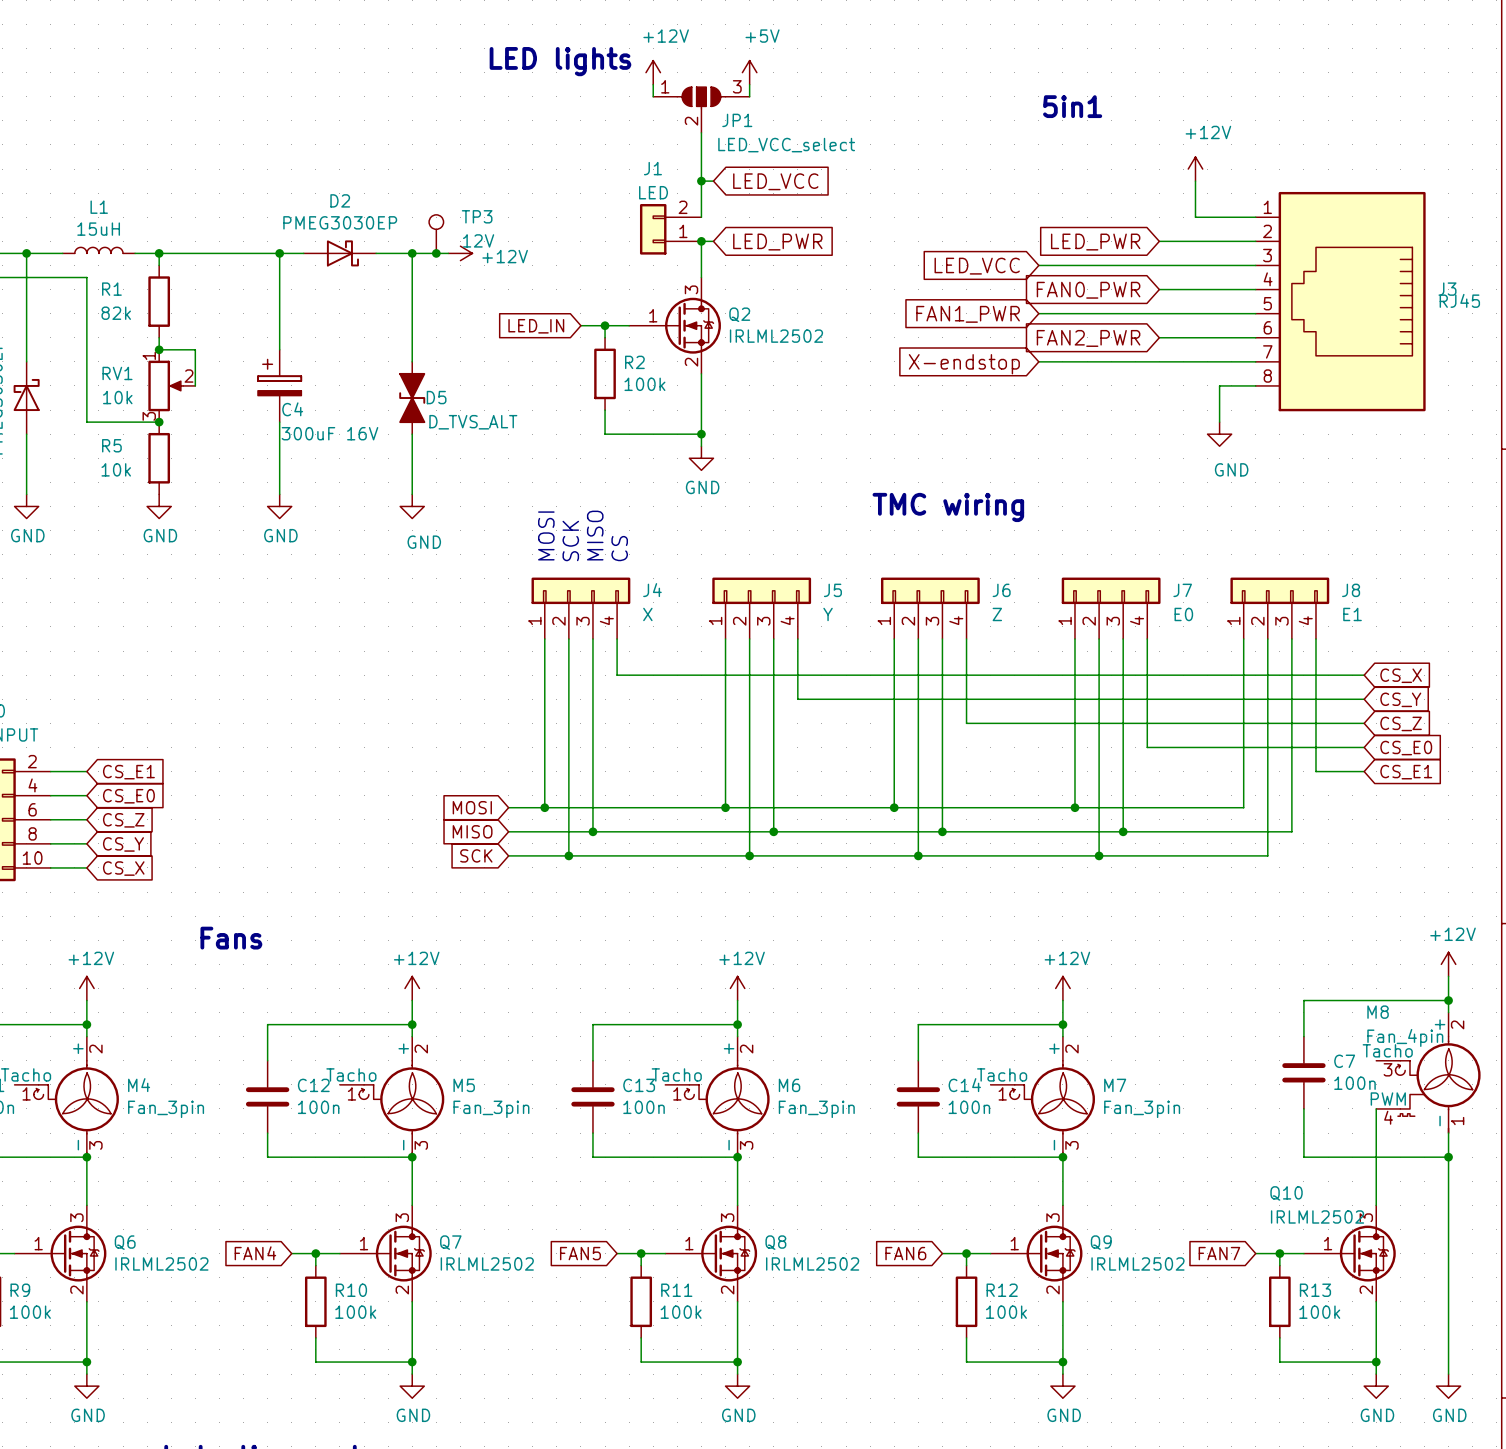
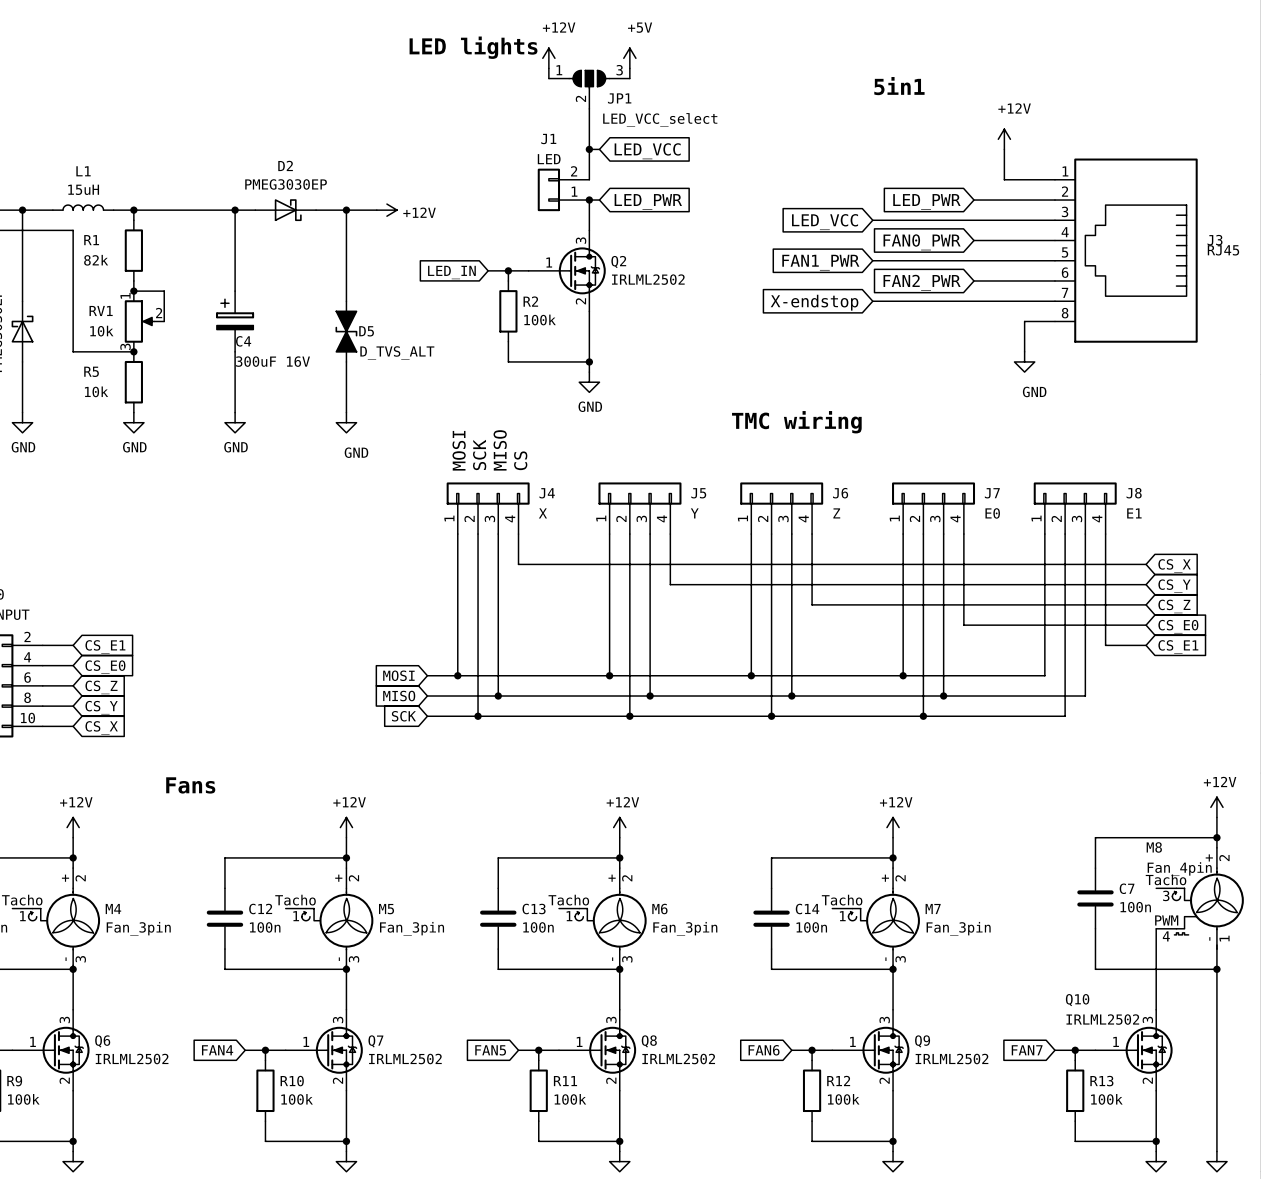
TP3: 12V (436, 234) -> none
junction: (436, 253) -> none

